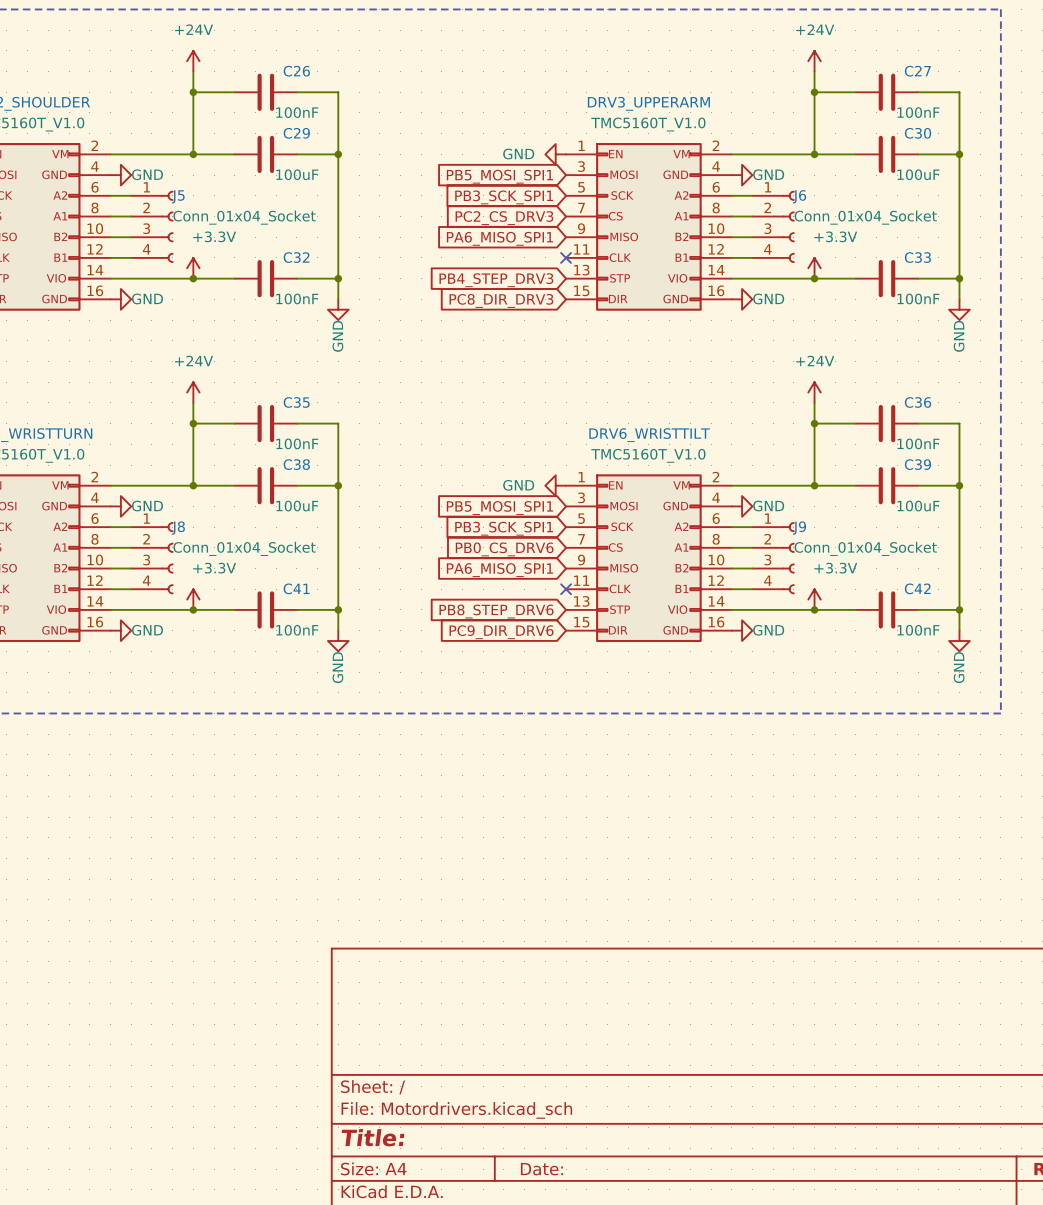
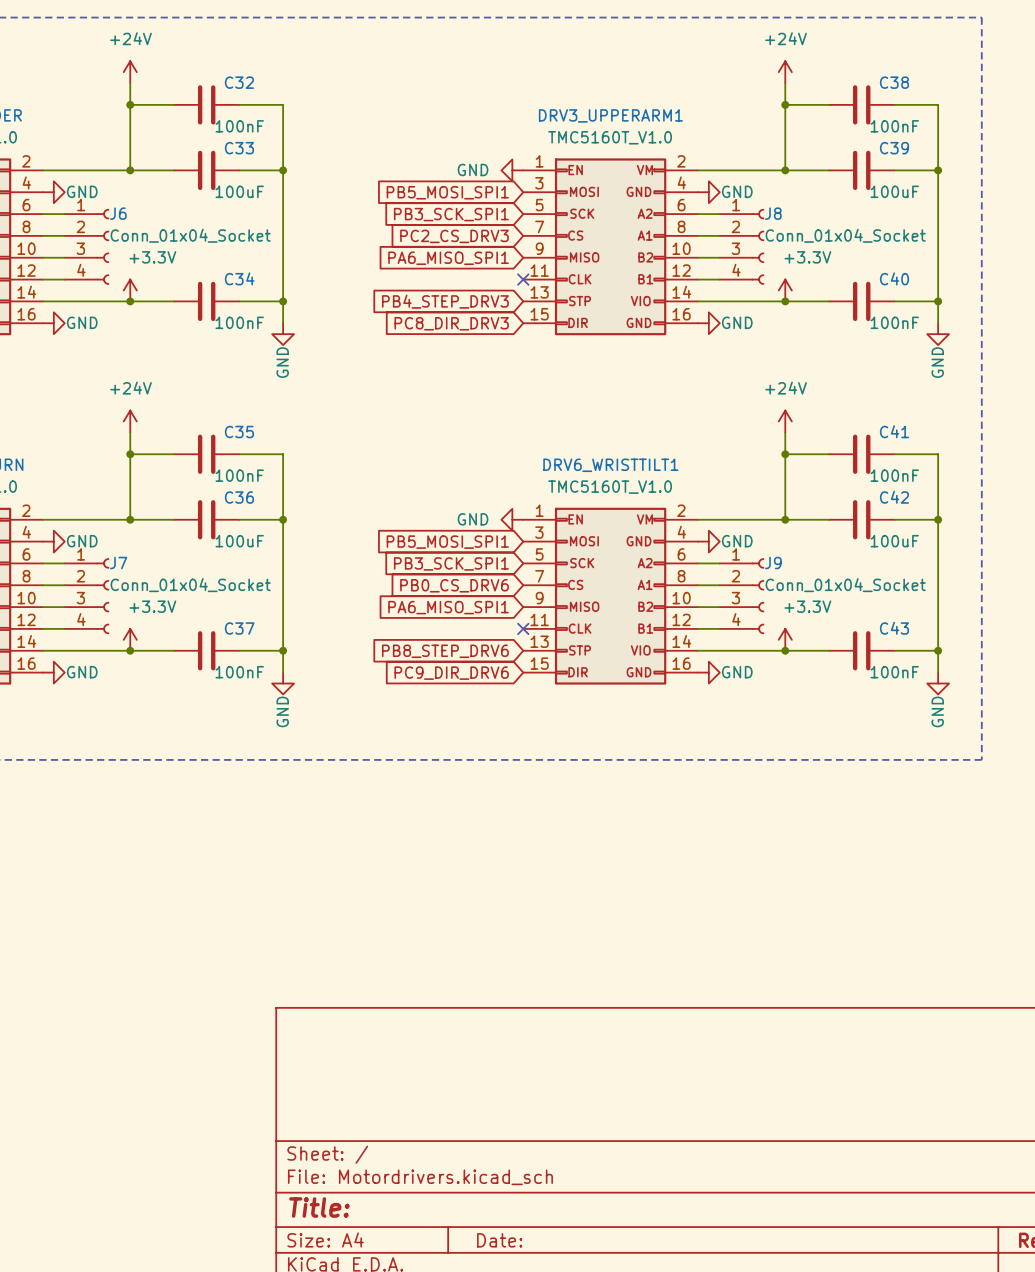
C26 name: C26 (296, 71) -> C32 (239, 82)
C27 name: C27 (917, 71) -> C38 (894, 82)
DRV3_UPPERARM name: DRV3_UPPERARM (648, 103) -> DRV3_UPPERARM1 (610, 115)
C29 name: C29 (296, 133) -> C33 (239, 148)
C30 name: C30 (917, 133) -> C39 (894, 148)
J5 name: J5 (178, 196) -> J6 (118, 213)
J6 name: J6 (799, 196) -> J8 (773, 213)
C32 name: C32 (296, 257) -> C34 (239, 278)
C33 name: C33 (917, 257) -> C40 (894, 278)
C36 name: C36 (918, 402) -> C41 (894, 431)
DRV6_WRISTTILT name: DRV6_WRISTTILT (649, 435) -> DRV6_WRISTTILT1 (610, 465)
C38 name: C38 (296, 464) -> C36 (239, 497)
C39 name: C39 (917, 464) -> C42 (894, 497)
J8 name: J8 (178, 528) -> J7 (118, 563)
C41 name: C41 (296, 588) -> C37 (239, 628)
C42 name: C42 (917, 588) -> C43 (894, 628)

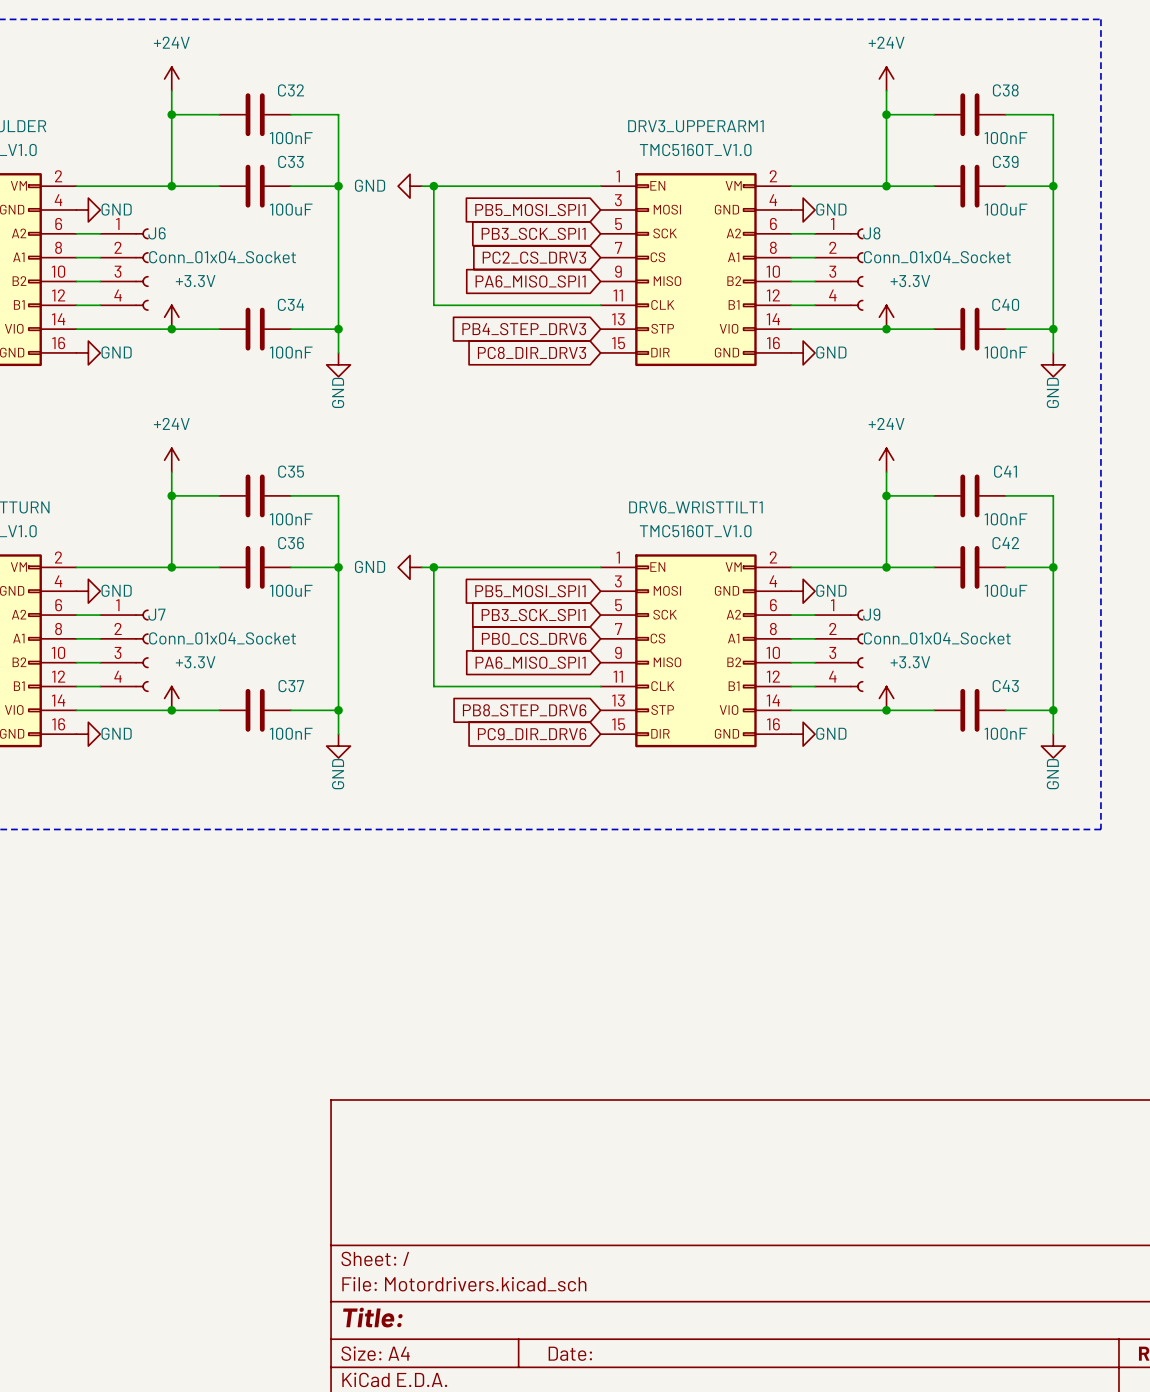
wire: none -> (421, 186) (600, 186)
wire: none -> (433, 186) (433, 305) (600, 305)
junction: none -> (433, 186)
power symbol position: GND (512, 170) -> GND (410, 186)
no-connect mark: (523, 279) -> none
wire: none -> (421, 567) (600, 567)
wire: none -> (433, 567) (433, 686) (600, 686)
junction: none -> (433, 567)
power symbol position: GND (512, 519) -> GND (410, 567)
no-connect mark: (523, 628) -> none

